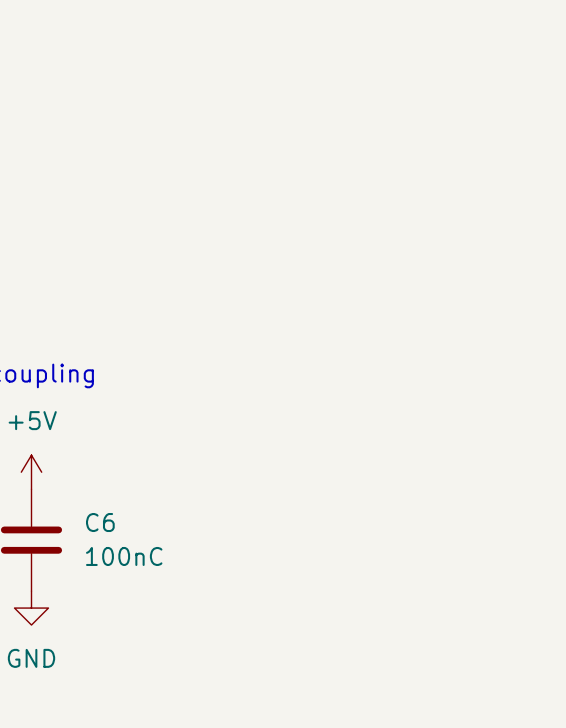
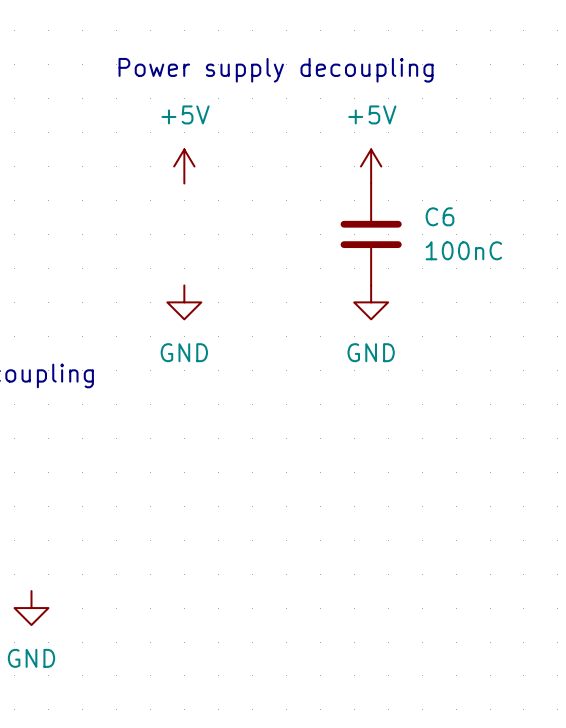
text: none -> Power supply decoupling (276, 70)
power symbol: none -> +5V (184, 166)
power symbol: none -> +5V (371, 166)
power symbol: none -> GND (184, 302)
power symbol: none -> GND (371, 302)
power symbol: +5V (31, 472) -> none
C6 position: (31, 540) -> (371, 234)

